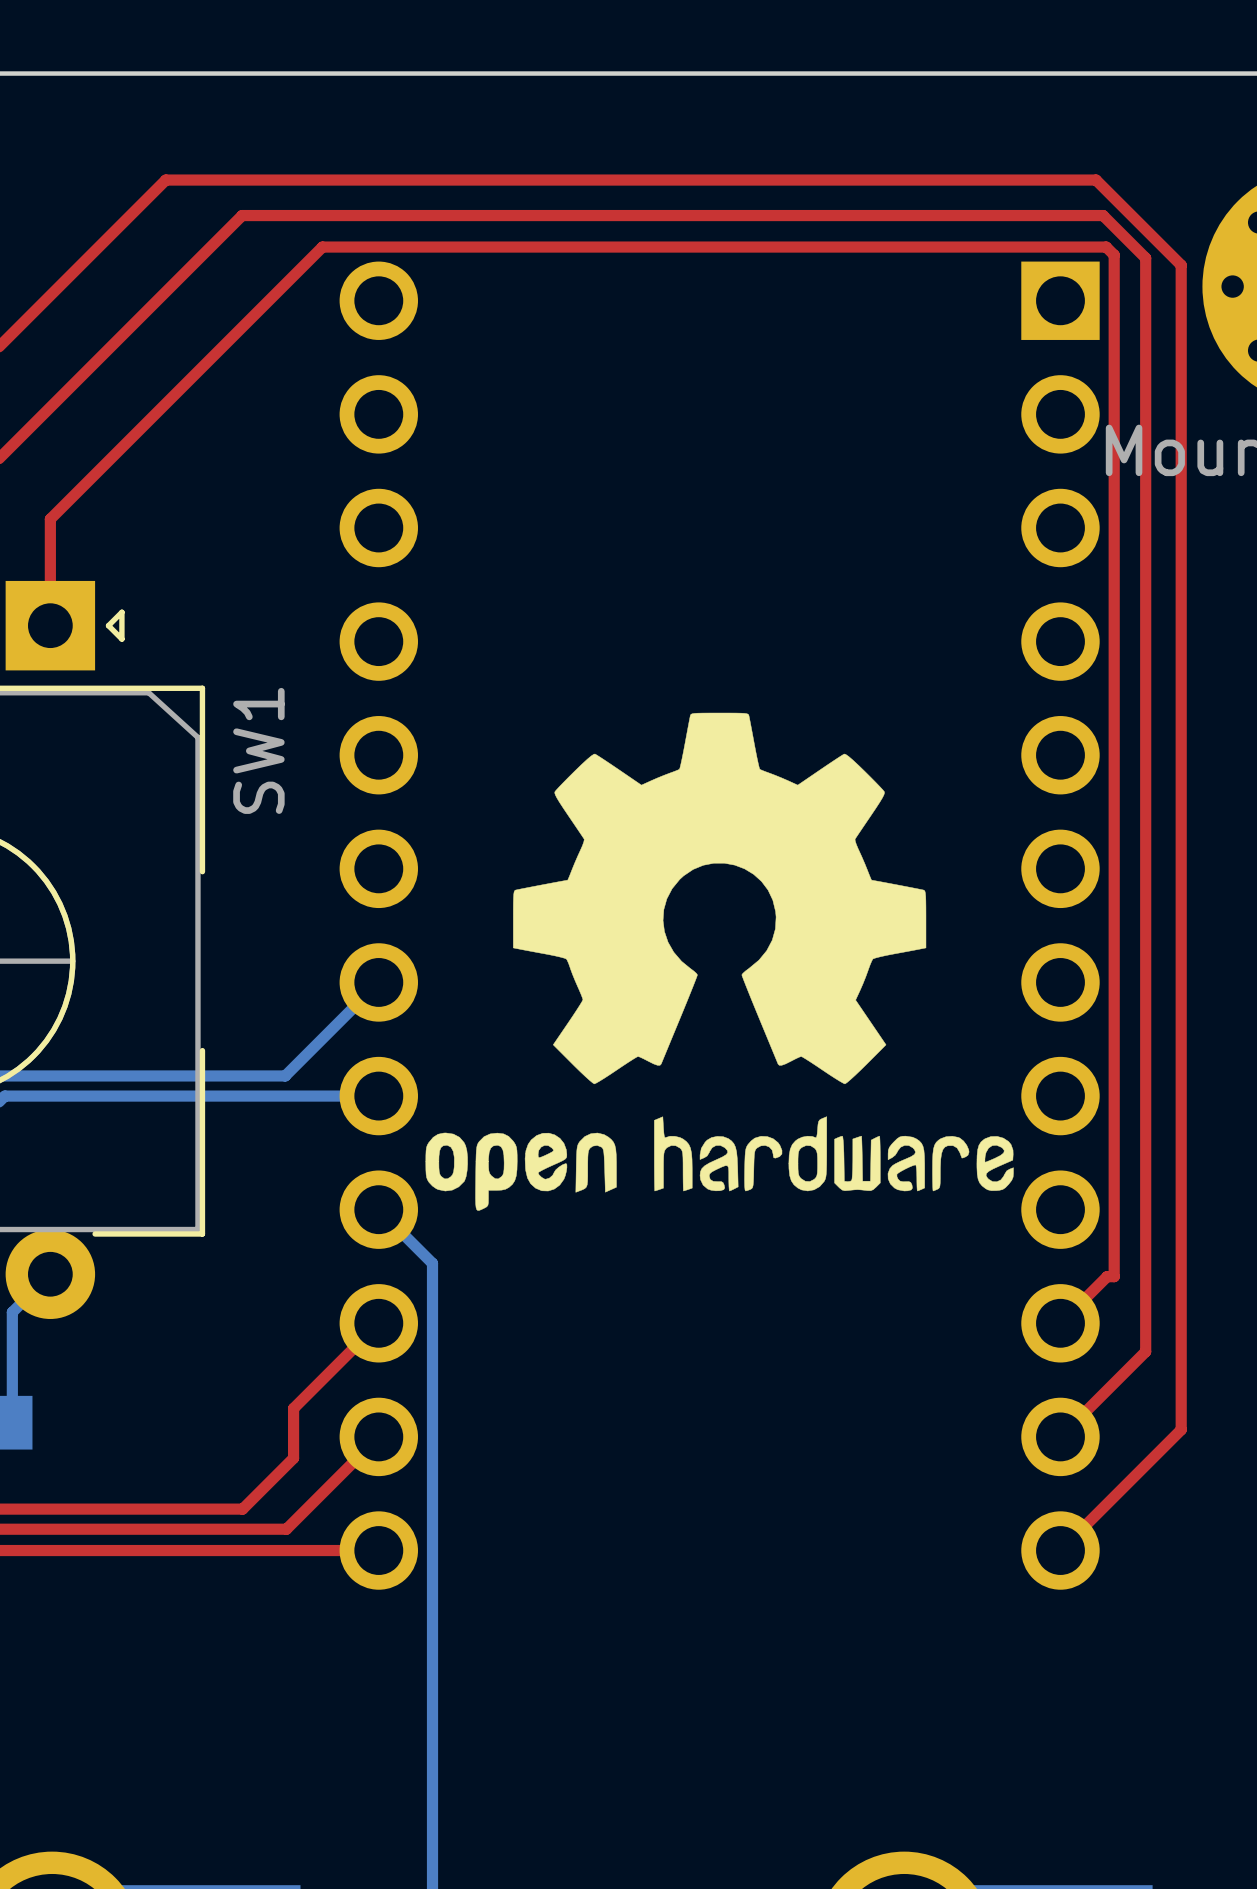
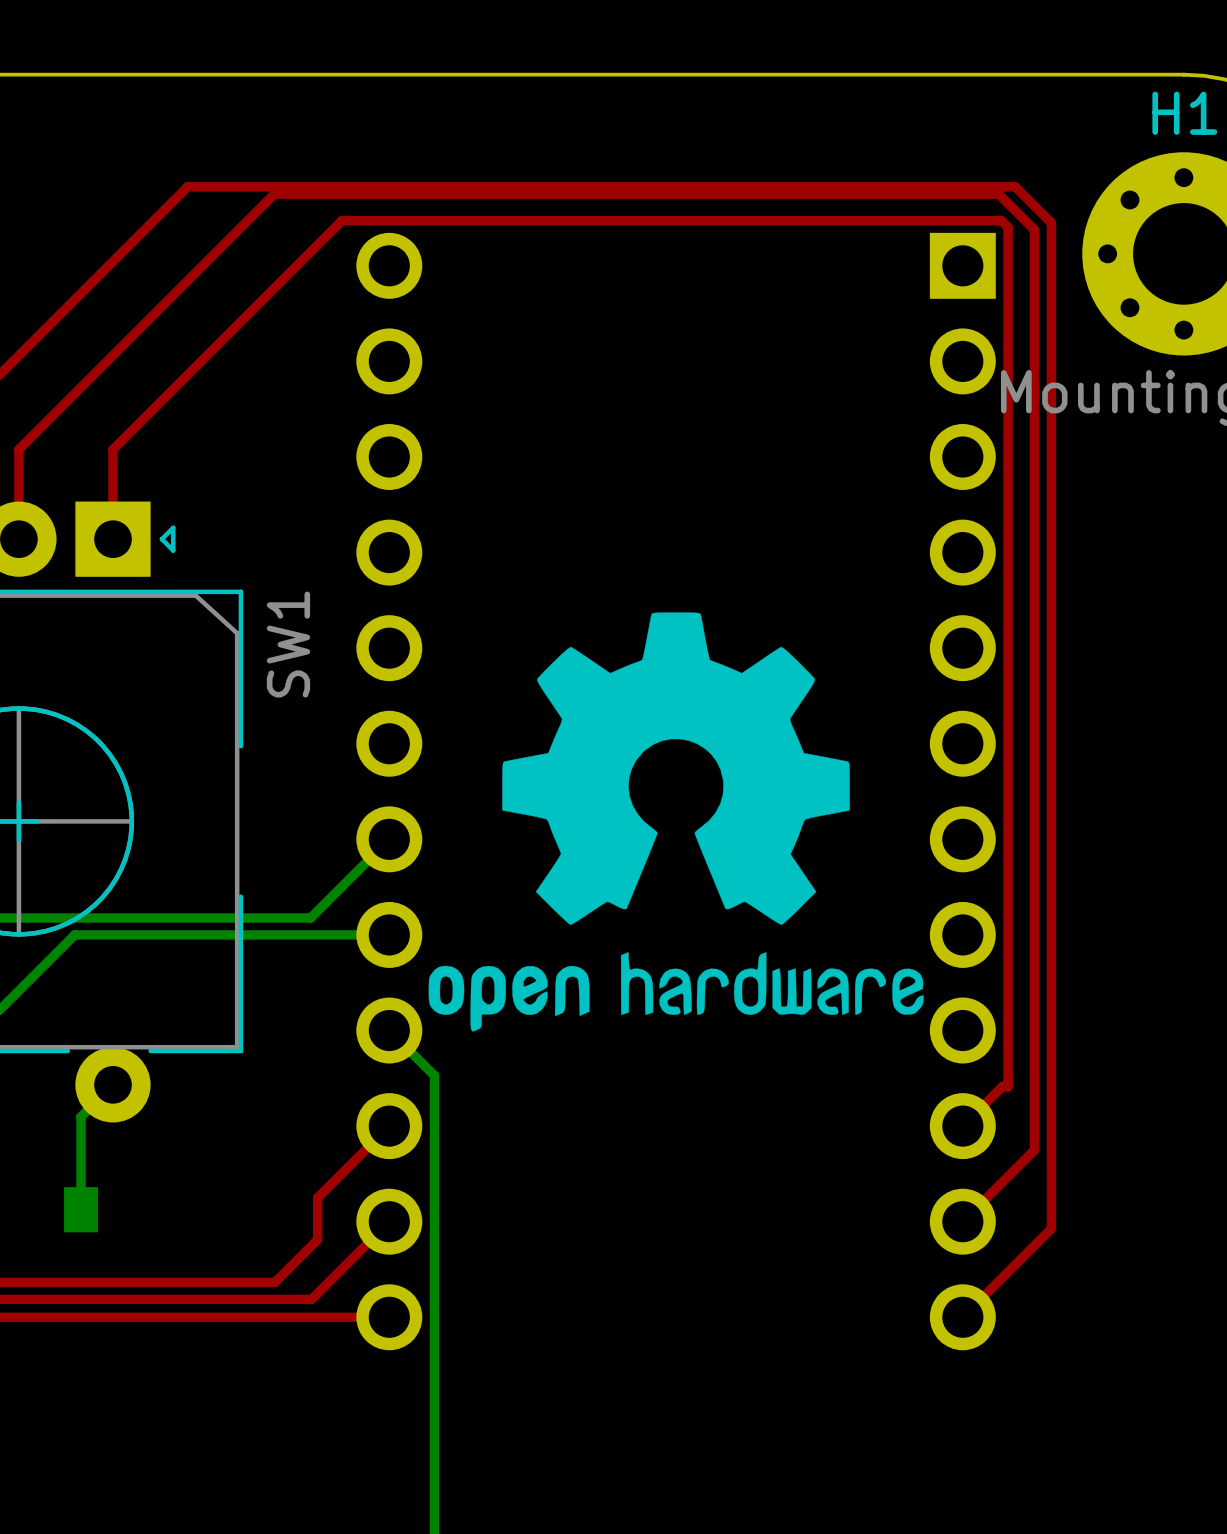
top track: (139, 206) (165, 180) (1096, 180) (1122, 206) -> (187, 186) (1015, 186)
top track: (1165, 249) (1181, 265) (1181, 1429) (1165, 1445) -> (1051, 222) (1051, 1228)

